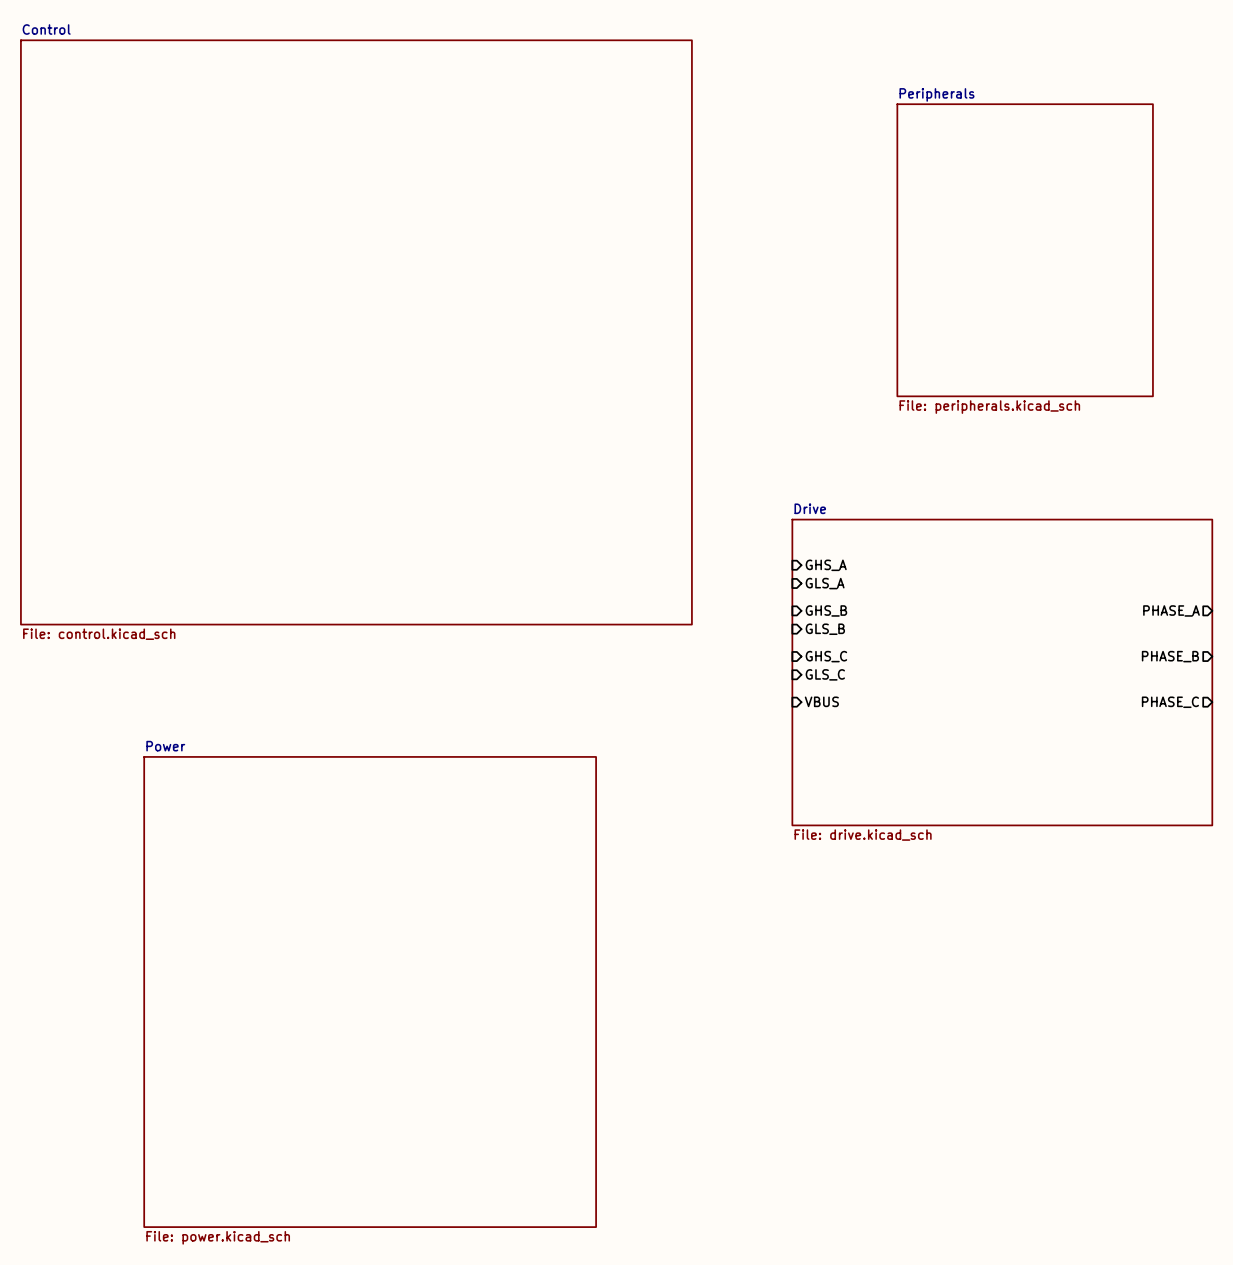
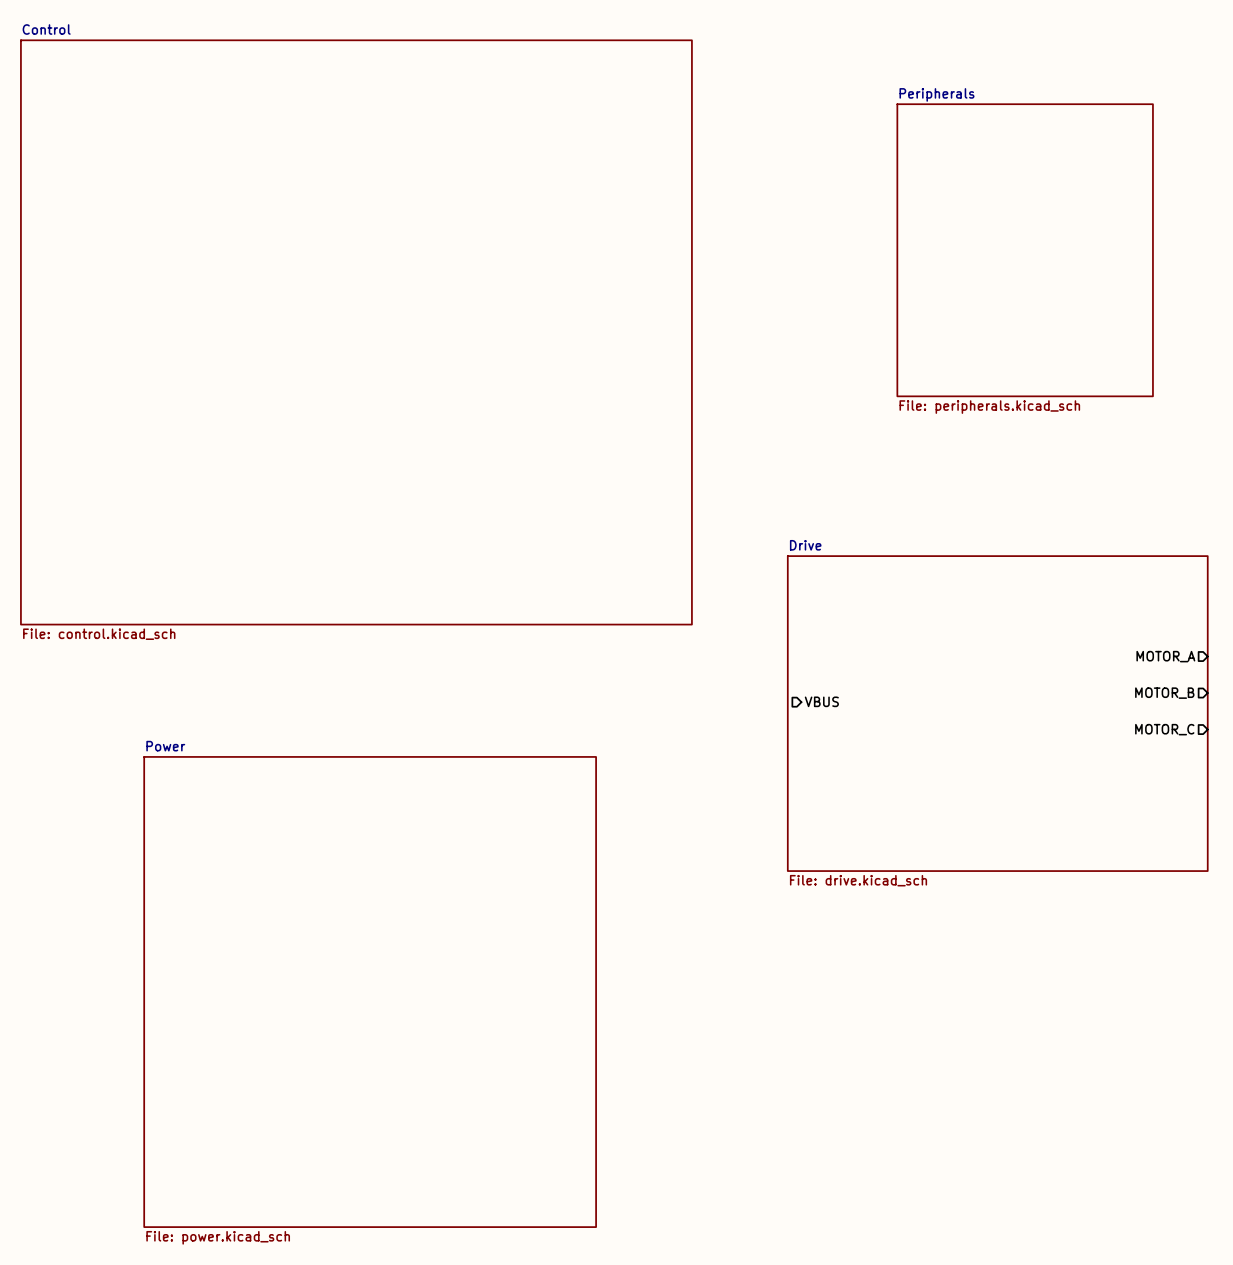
sheet pin: GHS_A (826, 565) -> none
sheet pin: GLS_A (825, 583) -> none
sheet pin: GHS_B (826, 610) -> none
sheet pin: PHASE_A (1171, 610) -> none
sheet pin: GLS_B (825, 629) -> none
sheet pin: GHS_C (826, 656) -> none
sheet pin: PHASE_B (1170, 656) -> MOTOR_A (1165, 656)
sheet Drive: File: drive.kicad_sch (1002, 672) -> none
sheet pin: GLS_C (825, 674) -> none
sheet pin: none -> MOTOR_B (1164, 693)
sheet pin: PHASE_C (1170, 702) -> none
sheet Drive: none -> File: drive.kicad_sch (997, 713)
sheet pin: none -> MOTOR_C (1164, 729)

